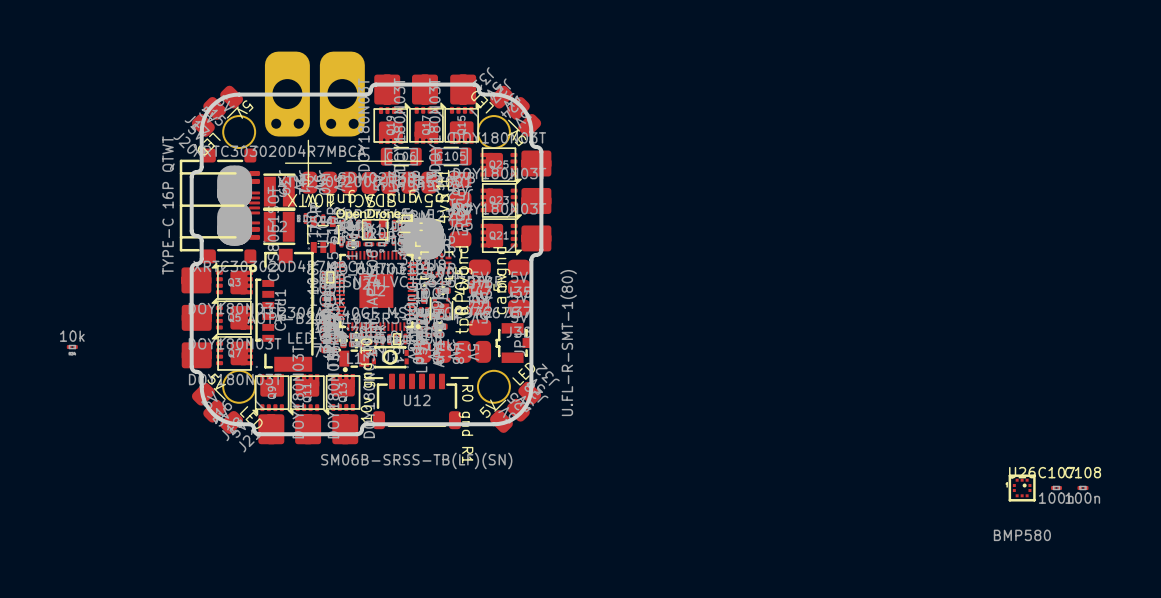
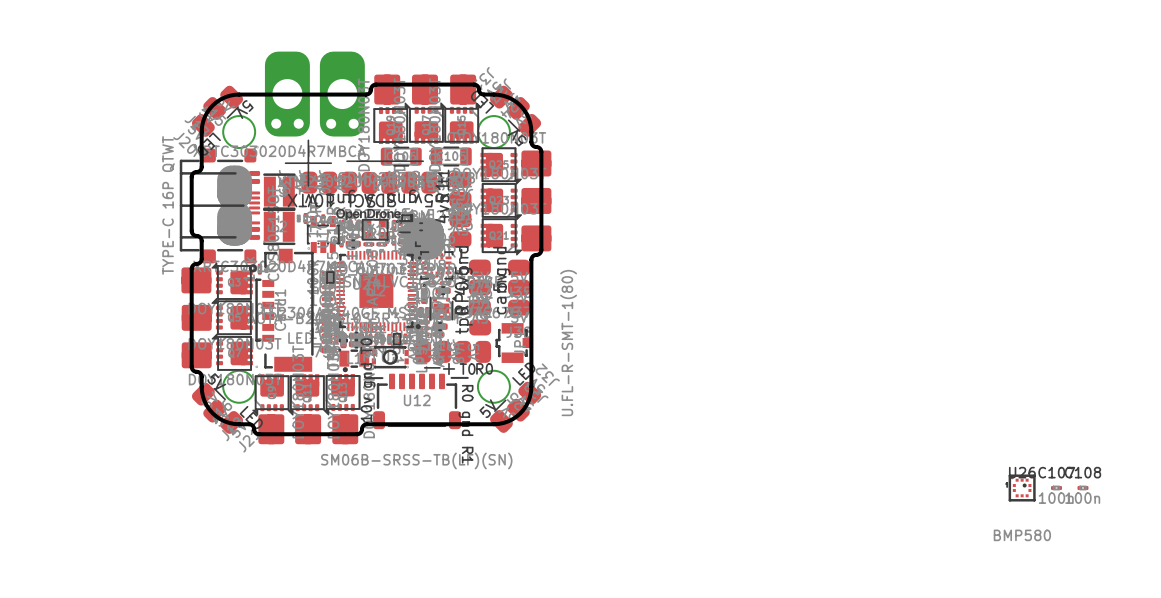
part rotation: 0° (72, 347) -> 90° clockwise (259, 269)
part position: (72, 347) -> (259, 269)
text: none -> - (432, 367)
text: none -> + (448, 368)
text: none -> R0 (484, 368)
text: none -> T0 (467, 369)

